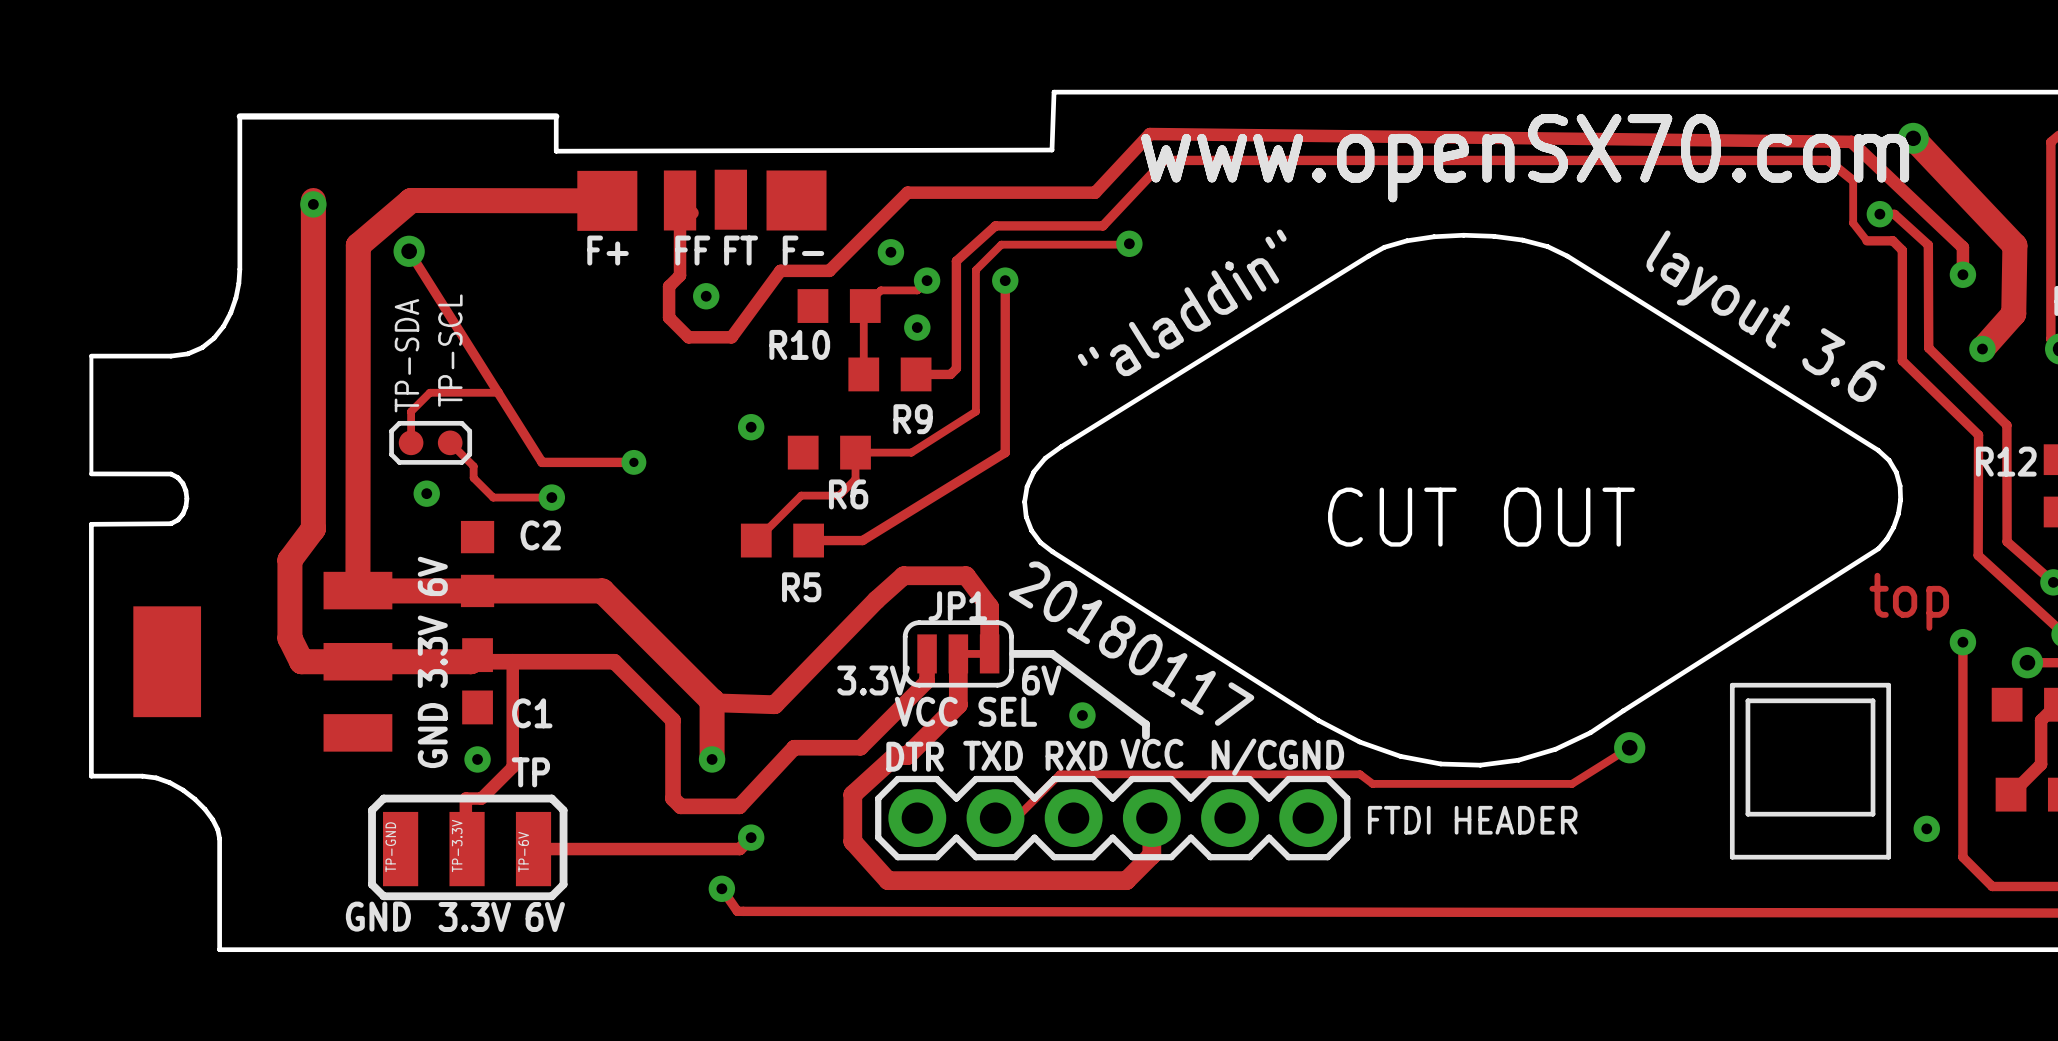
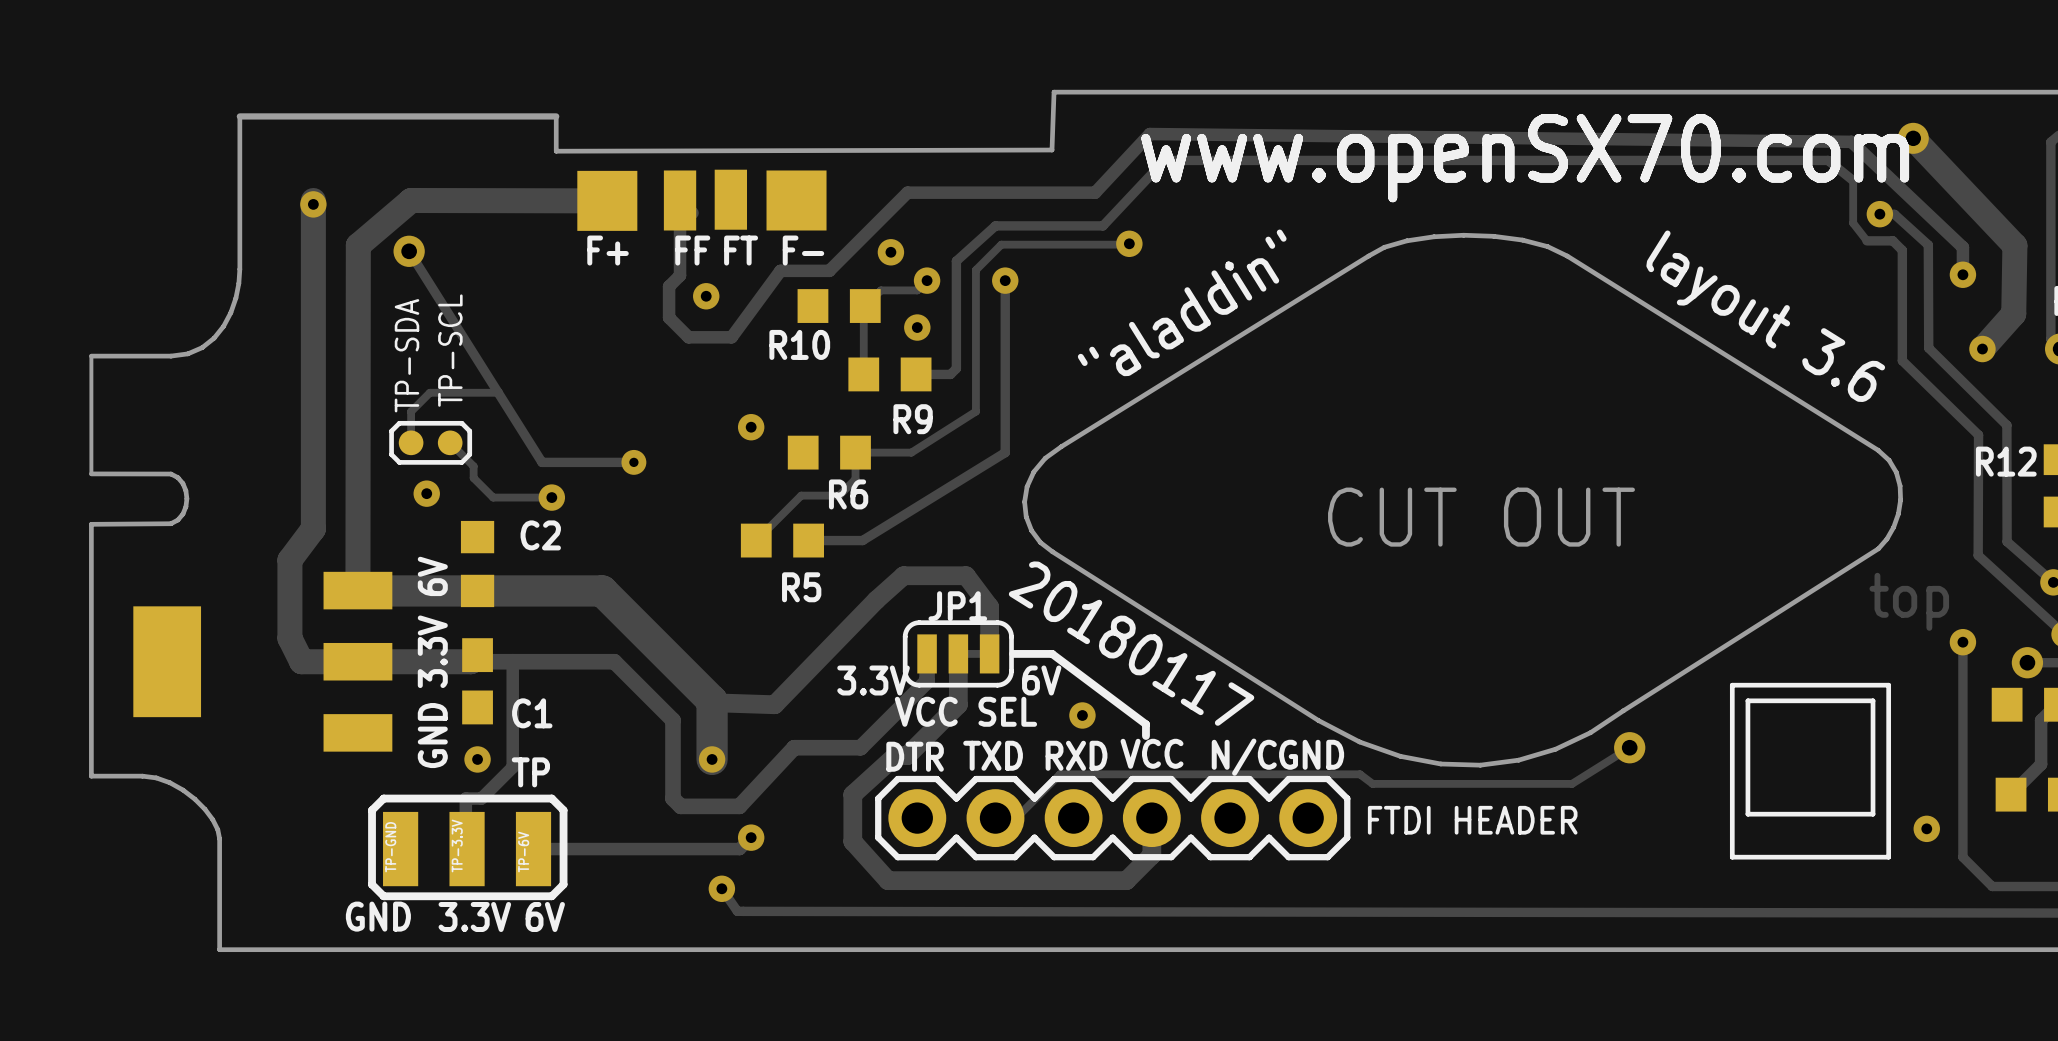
track width: thin (358, 590) (602, 590) (712, 700) (712, 759) -> thick (358, 590) (602, 590) (712, 700) (712, 759)

